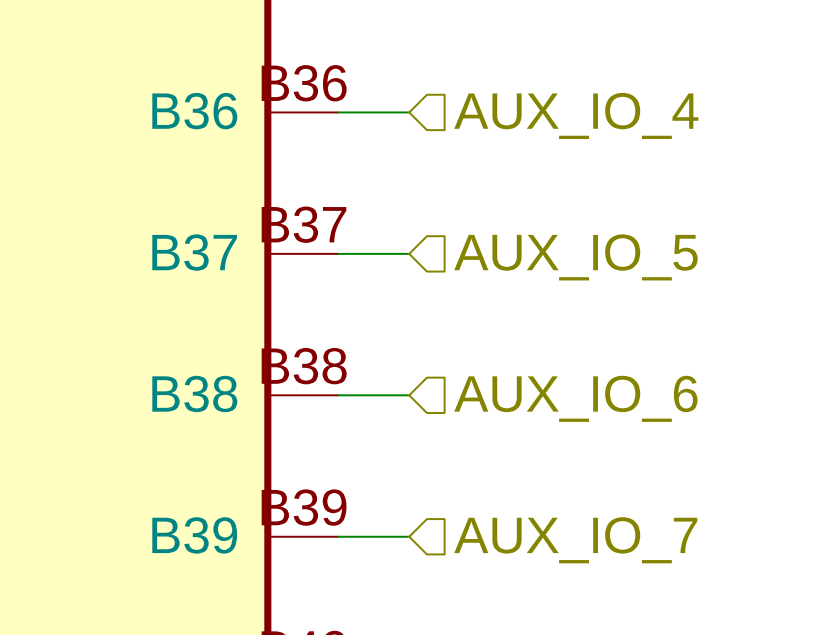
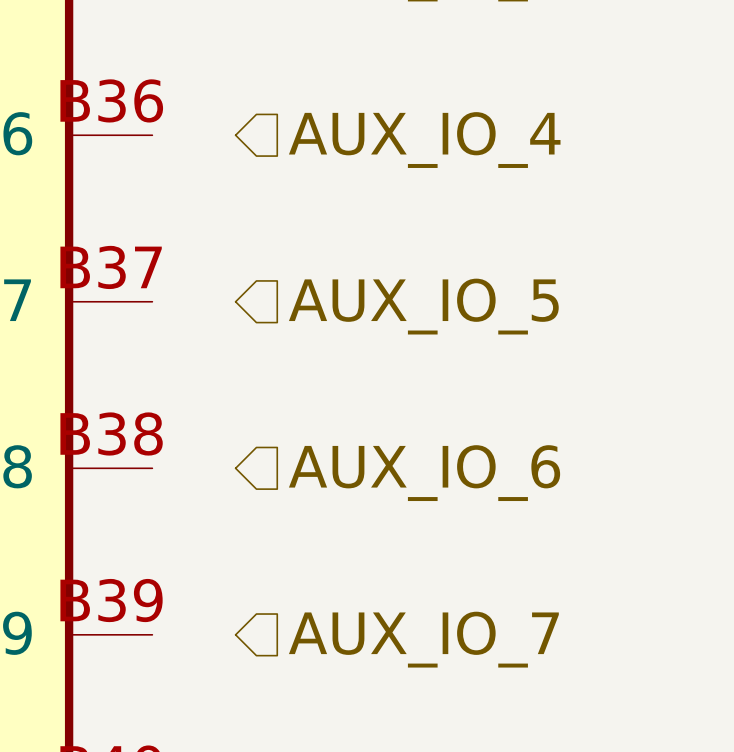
wire: (338, 112) (409, 112) -> none
wire: (338, 253) (409, 253) -> none
wire: (338, 395) (409, 395) -> none
wire: (338, 536) (409, 536) -> none

